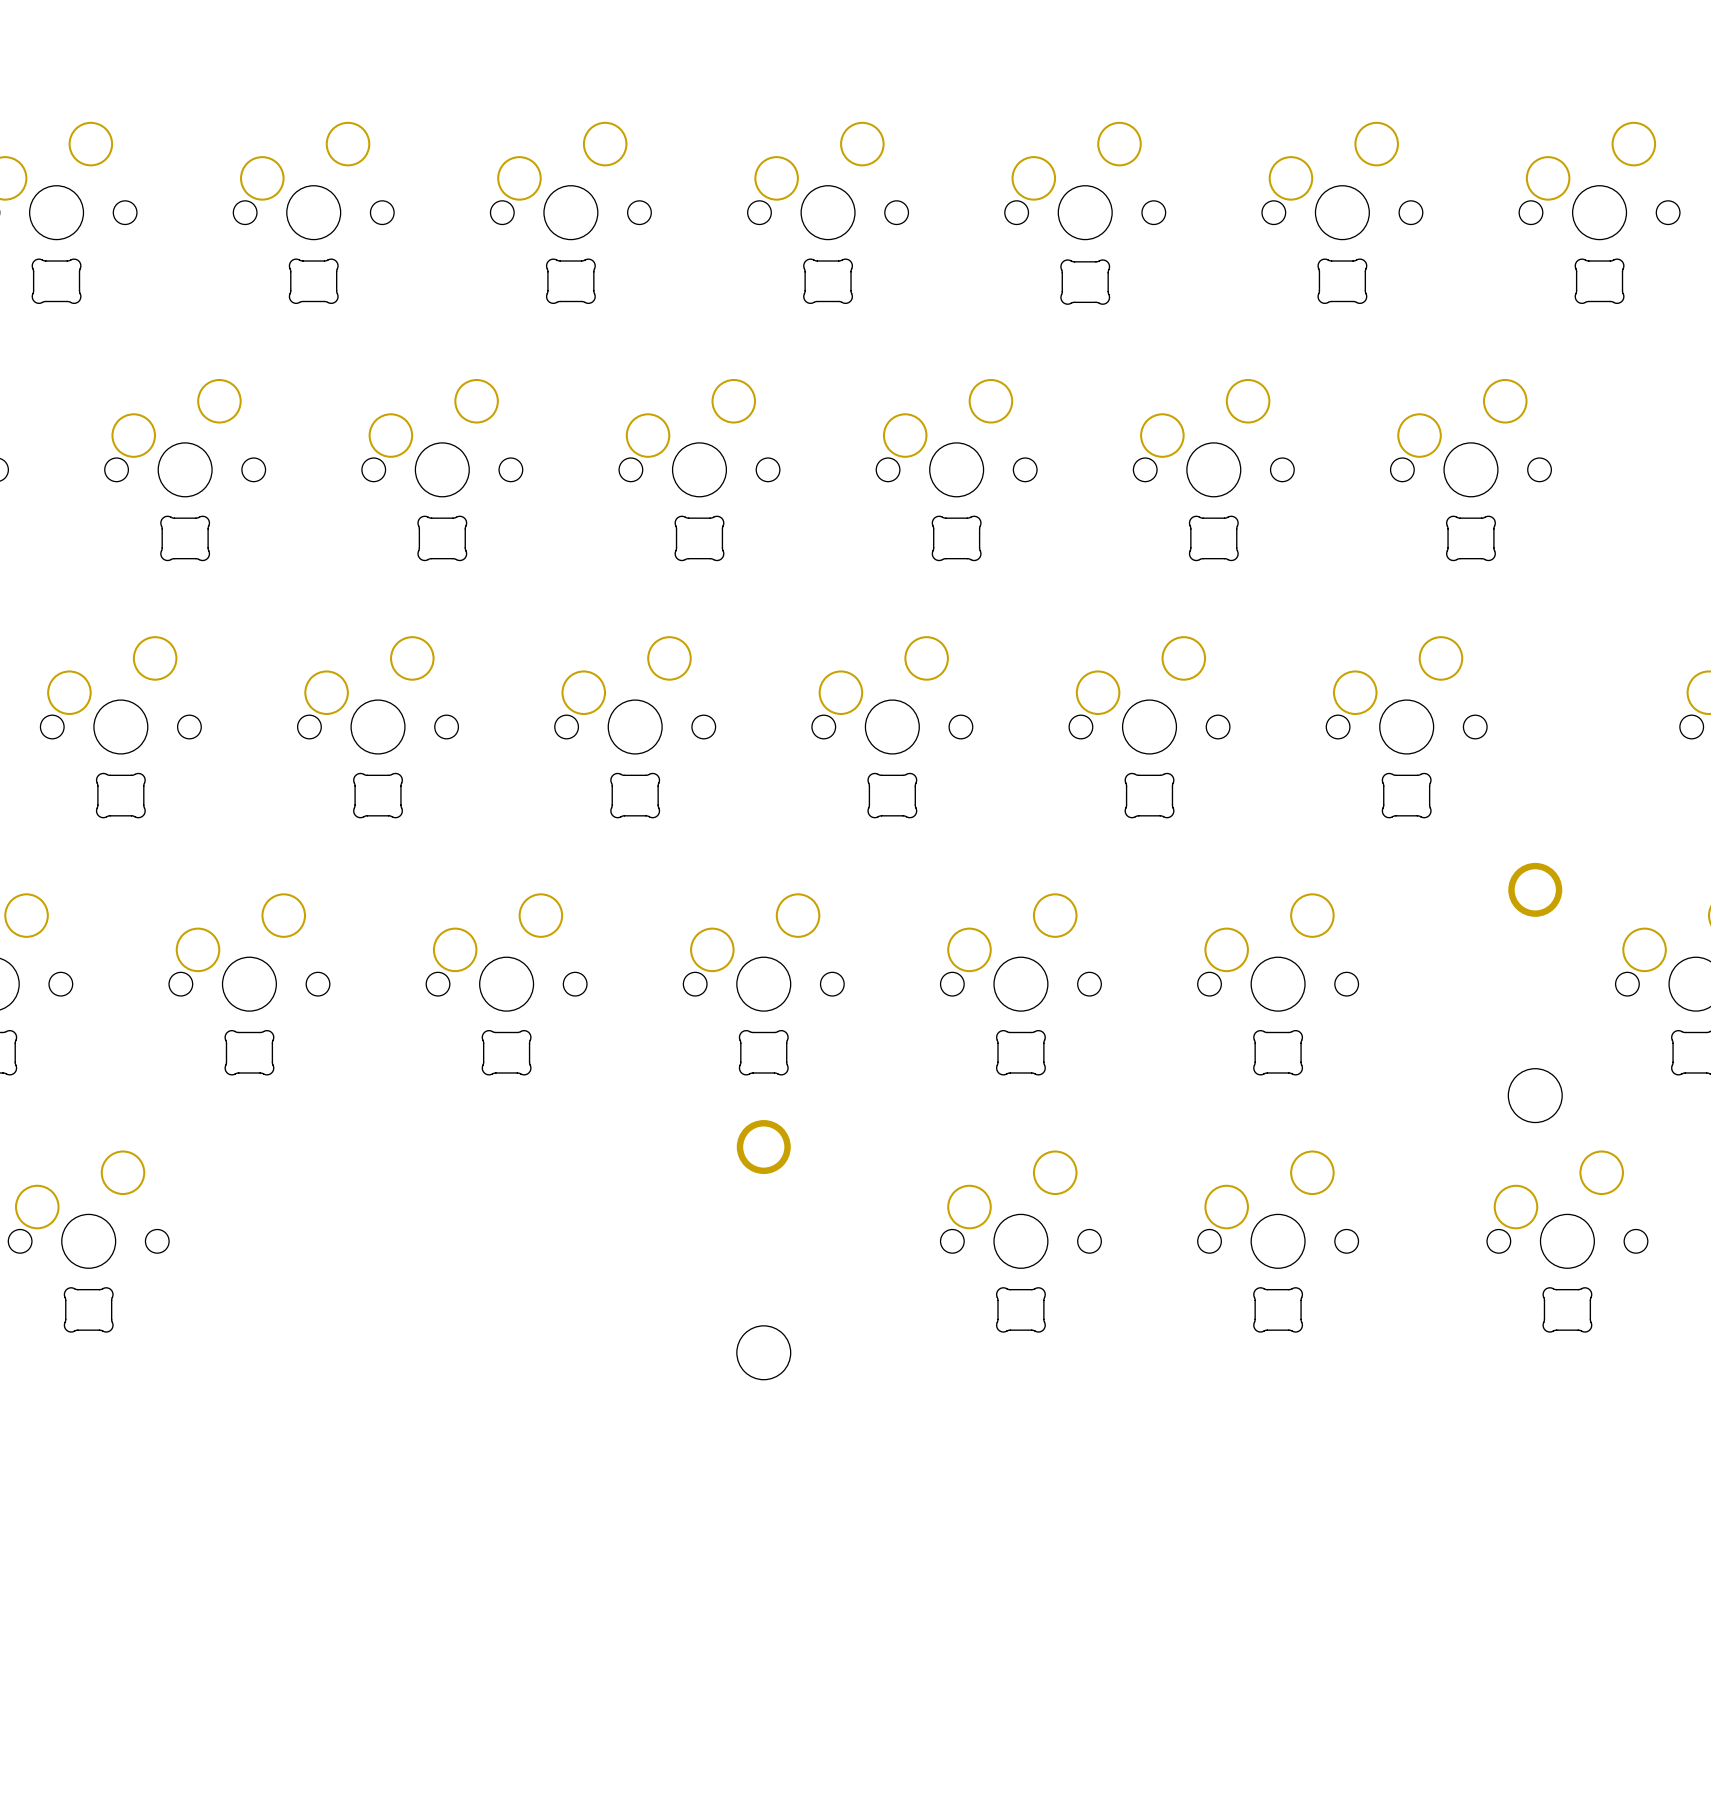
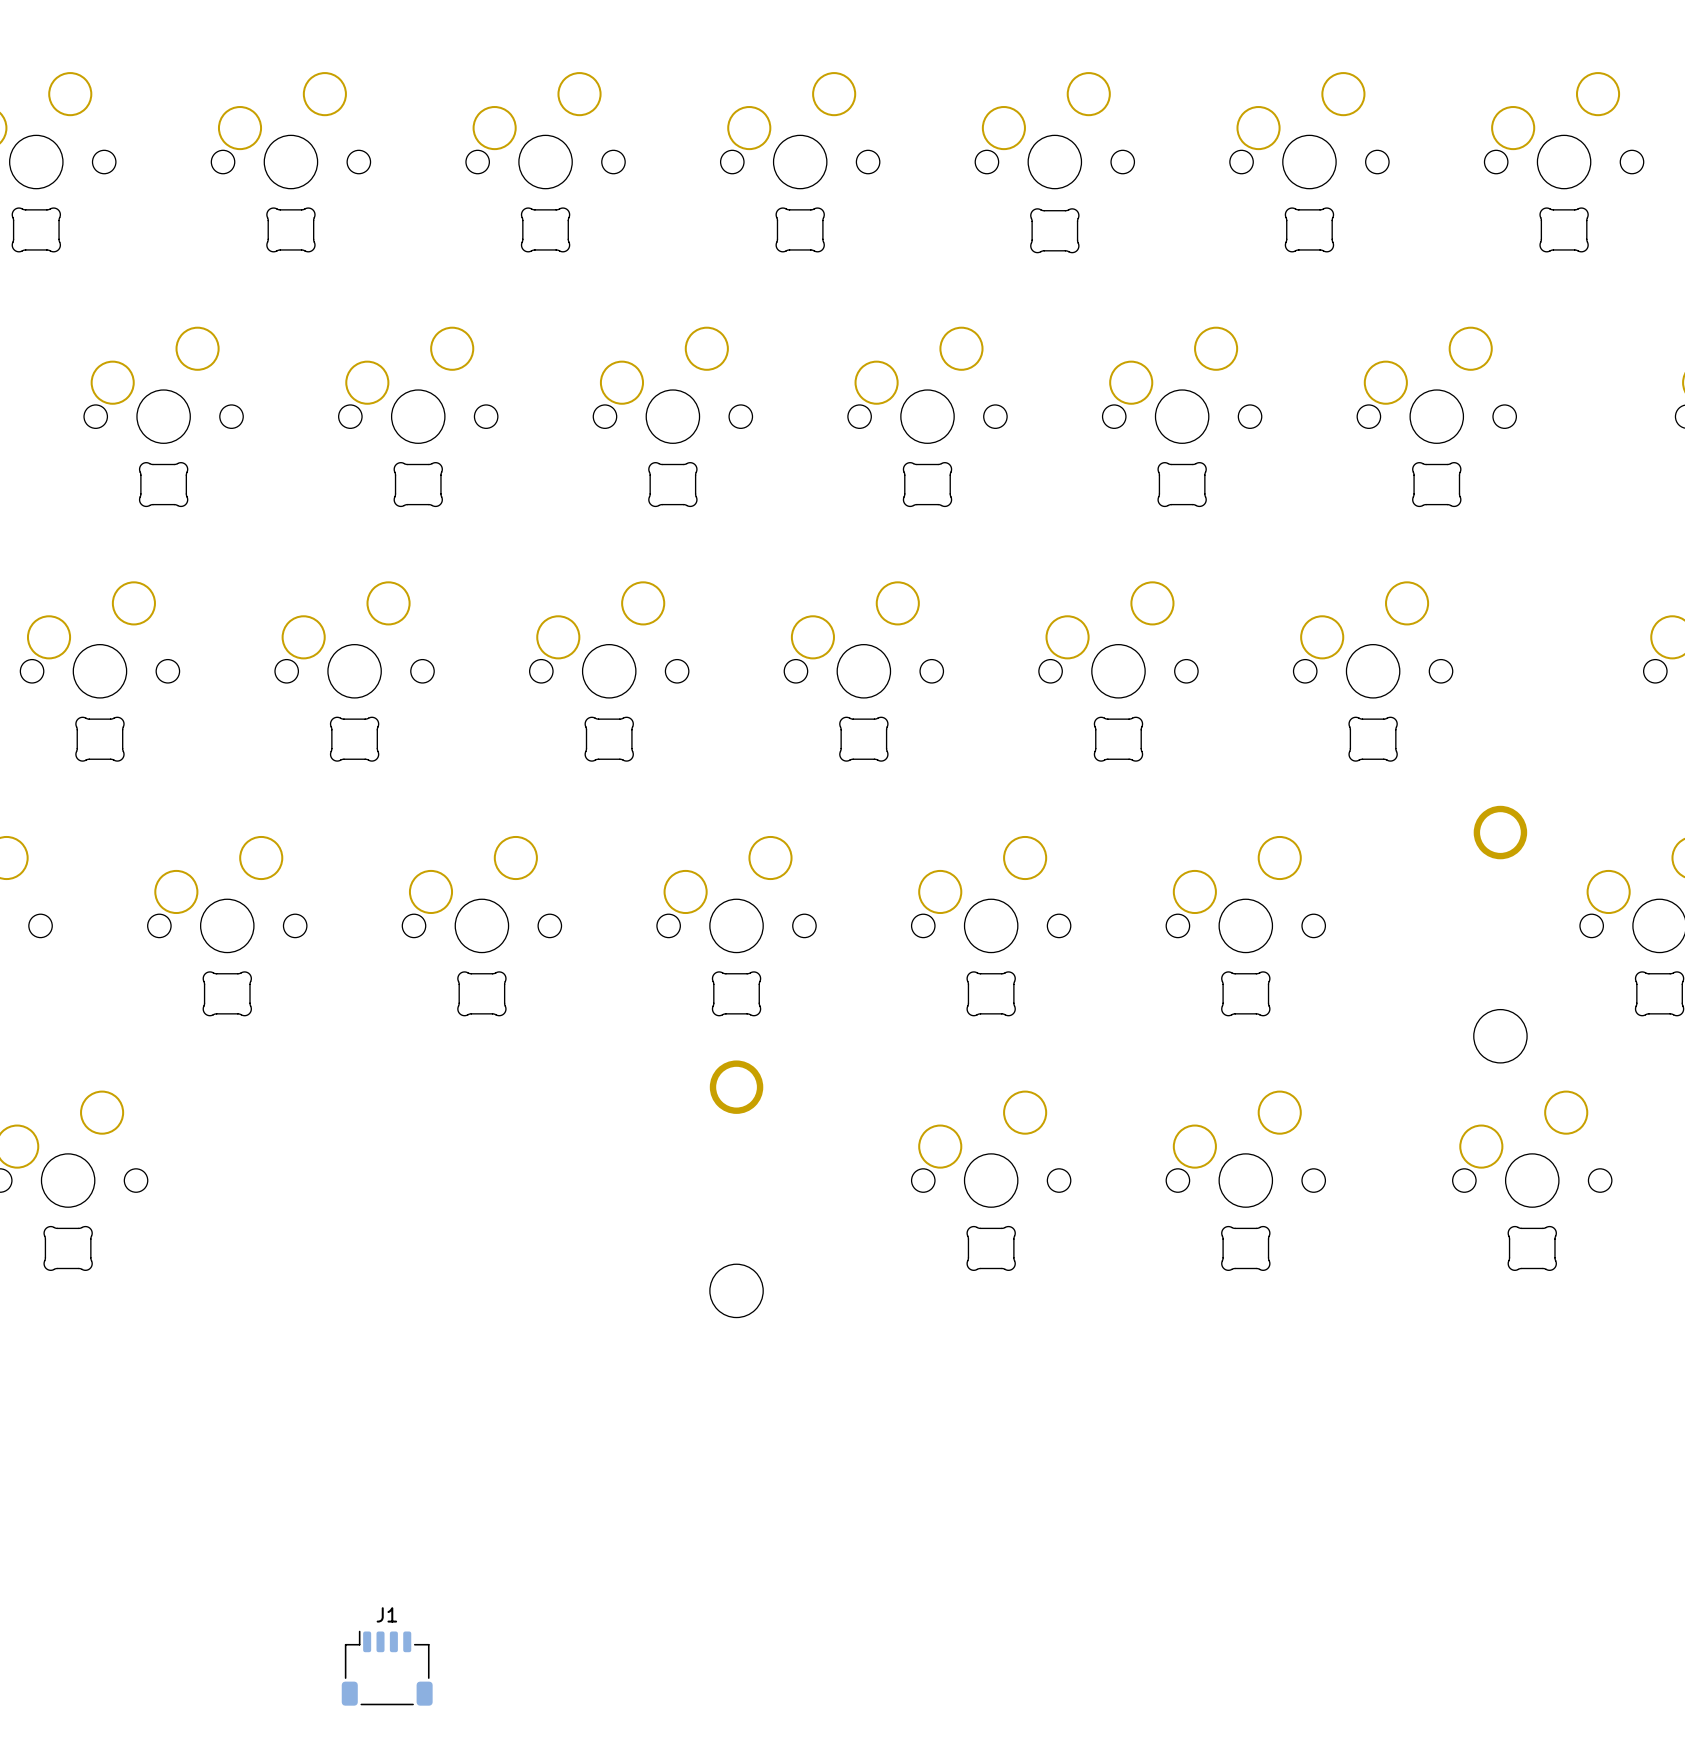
J1: none -> (387, 1668)

